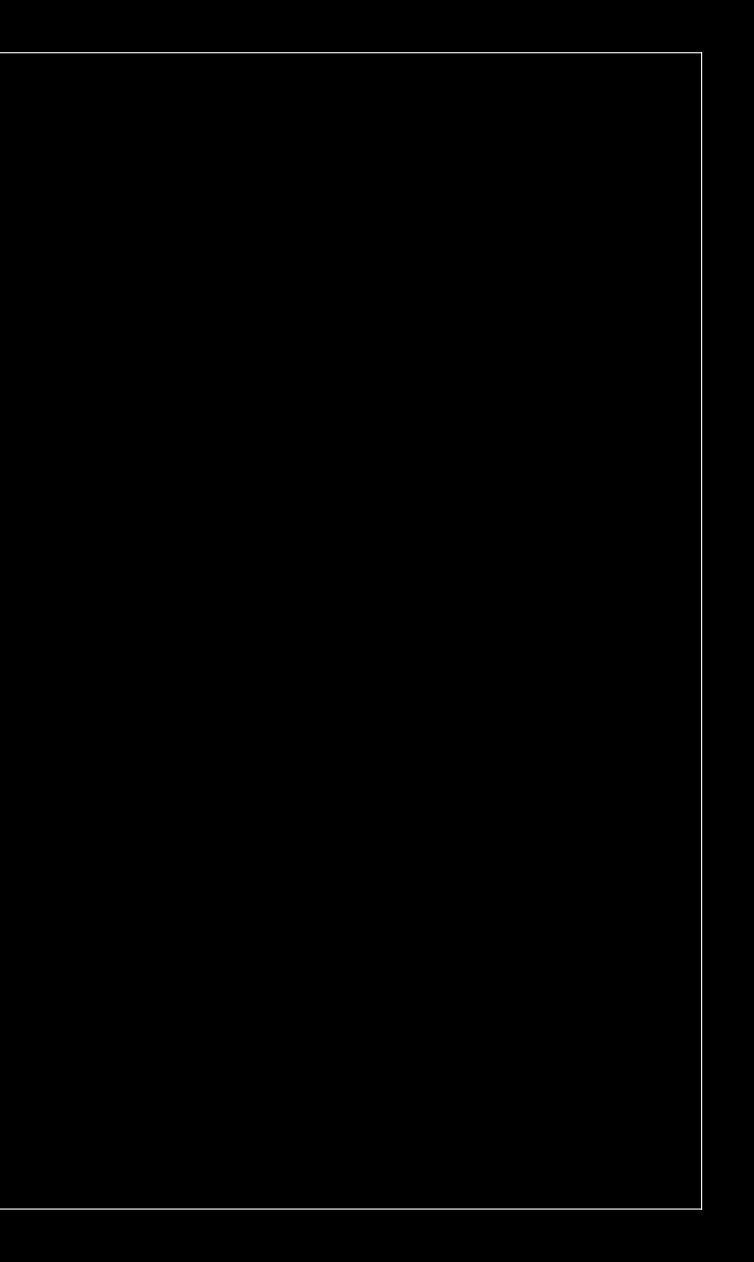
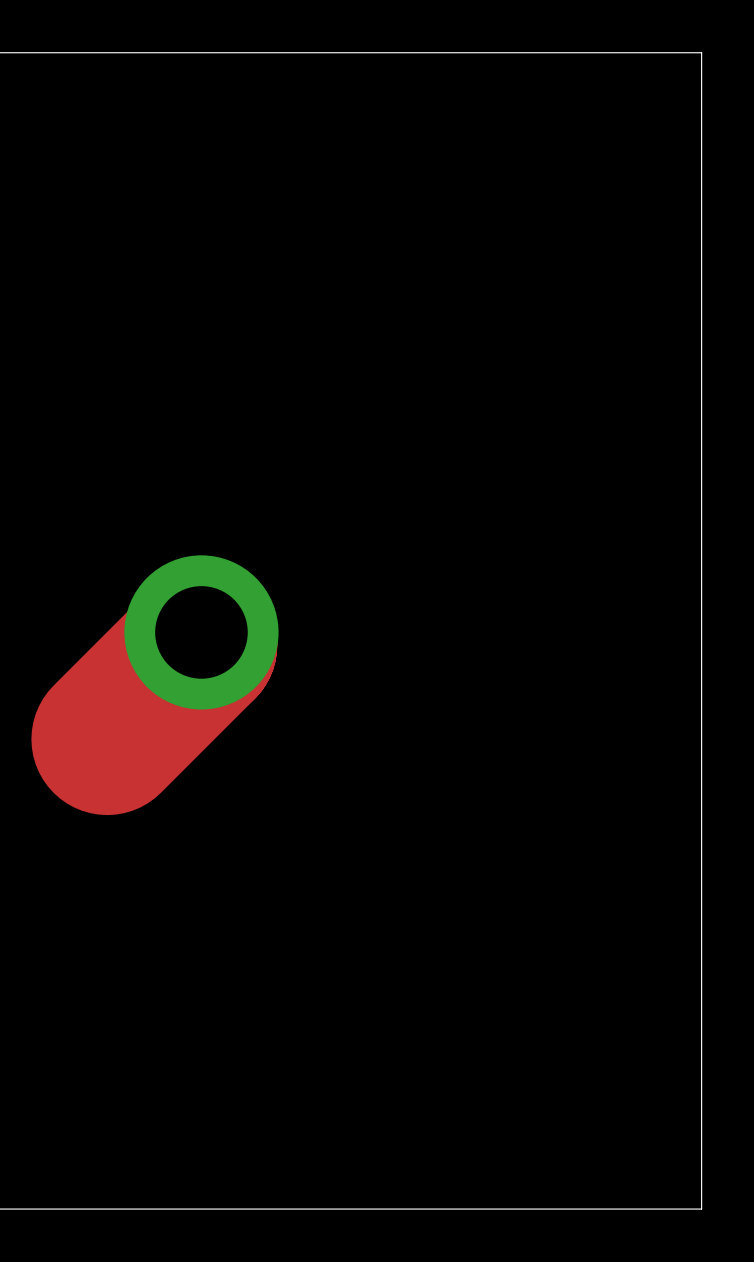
top track: none -> (201, 632) (201, 645) (107, 739)
part: none -> (201, 632)

